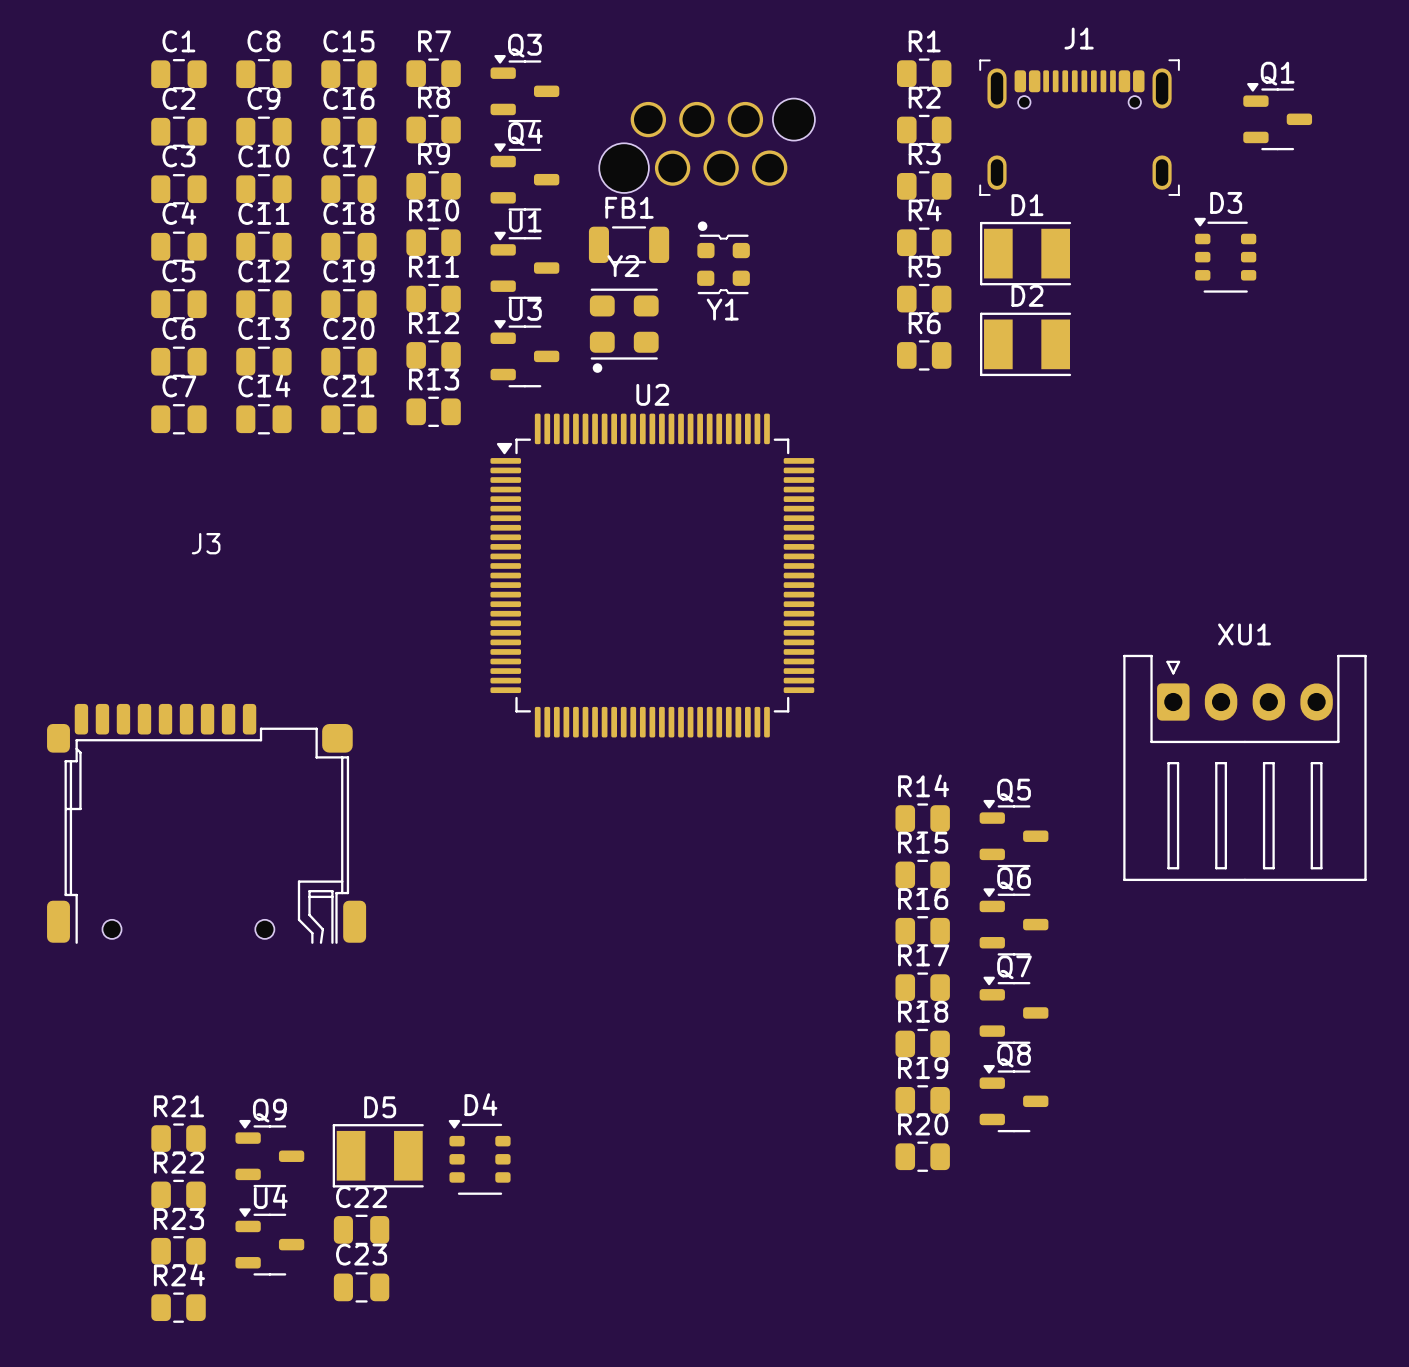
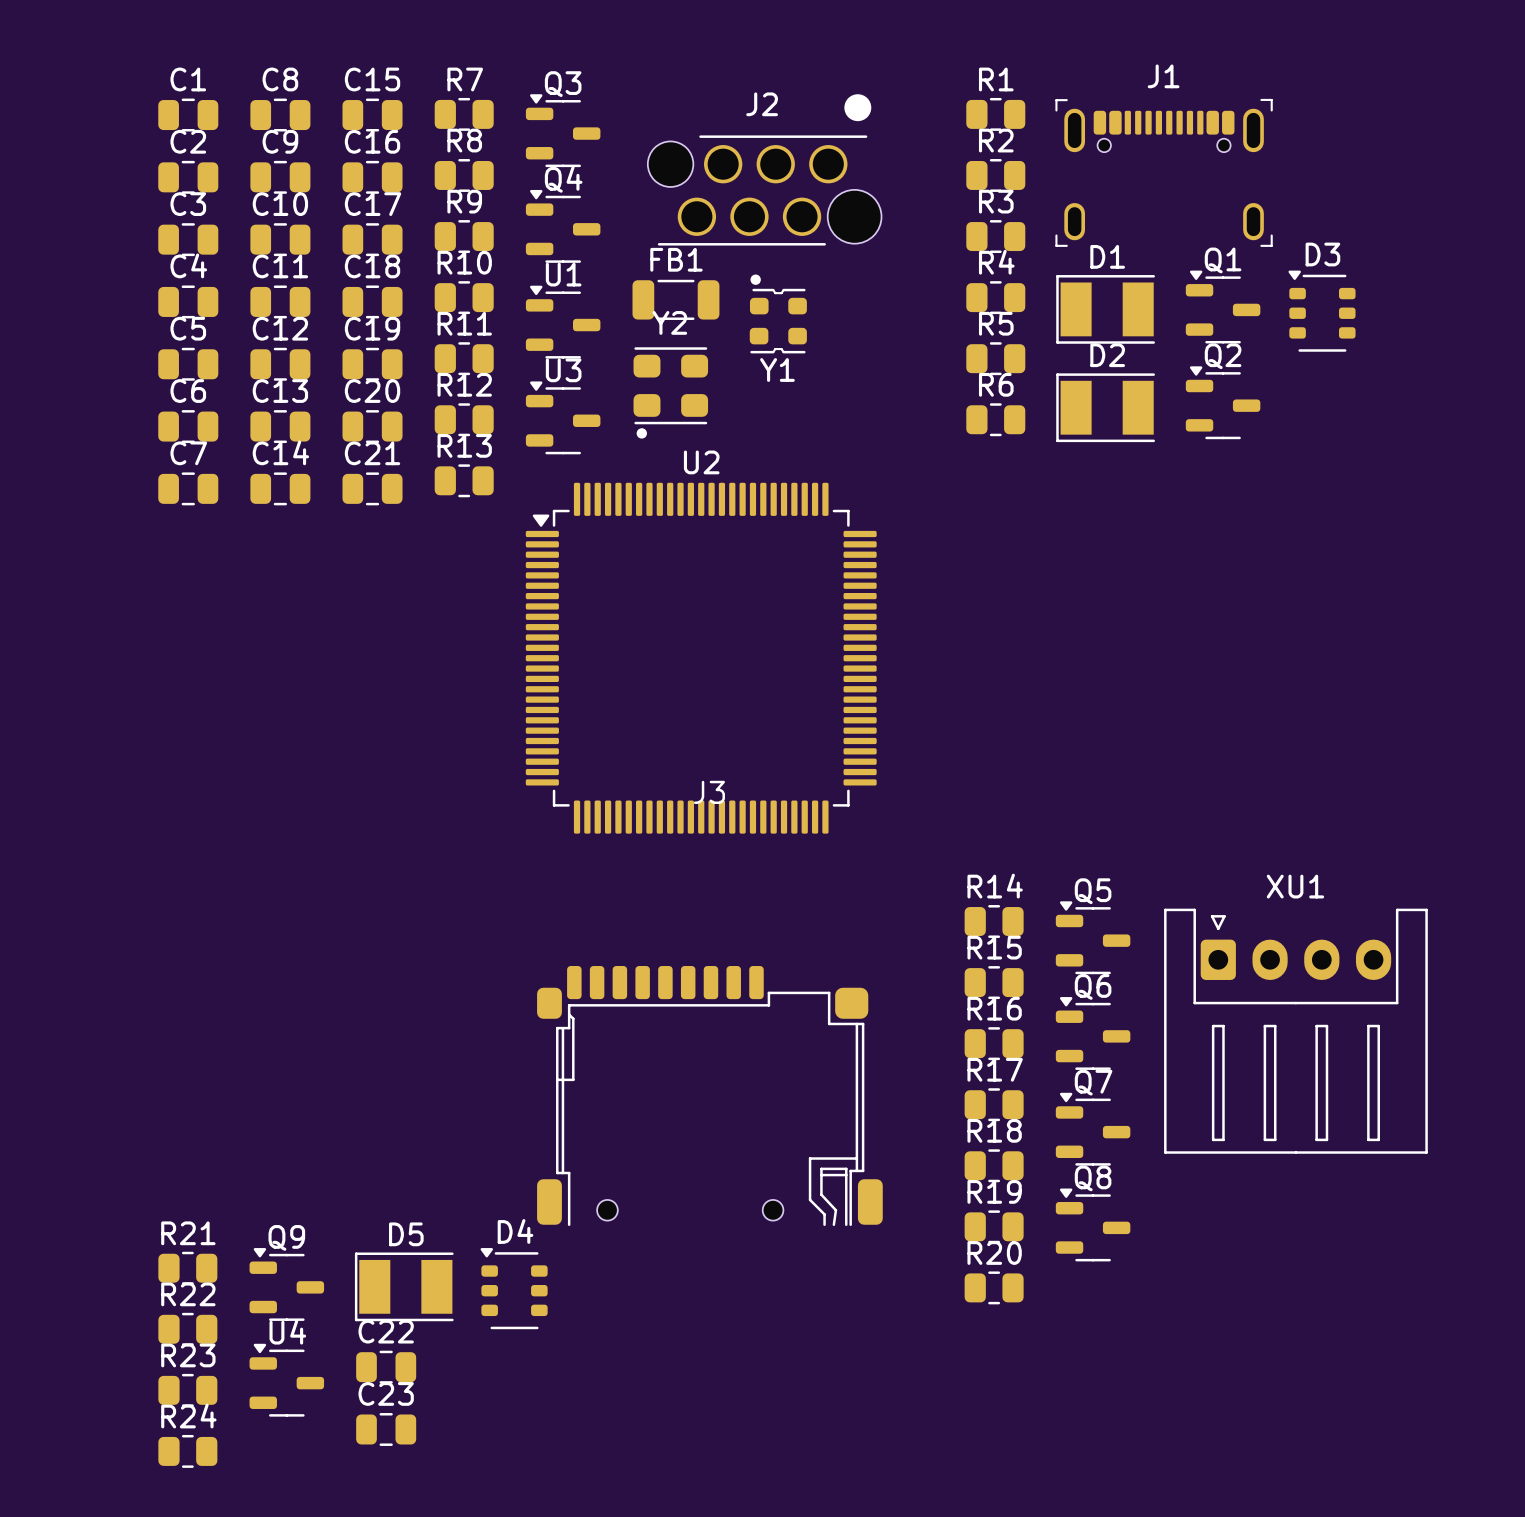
Q1 position: (1277, 116) -> (1223, 307)
J2 side: bottom (707, 145) -> top (764, 169)
Q2: none -> (1223, 402)
J3 footprint: [47, 703, 367, 944] -> [537, 966, 883, 1227]
XU1 position: (1244, 767) -> (1295, 1031)

